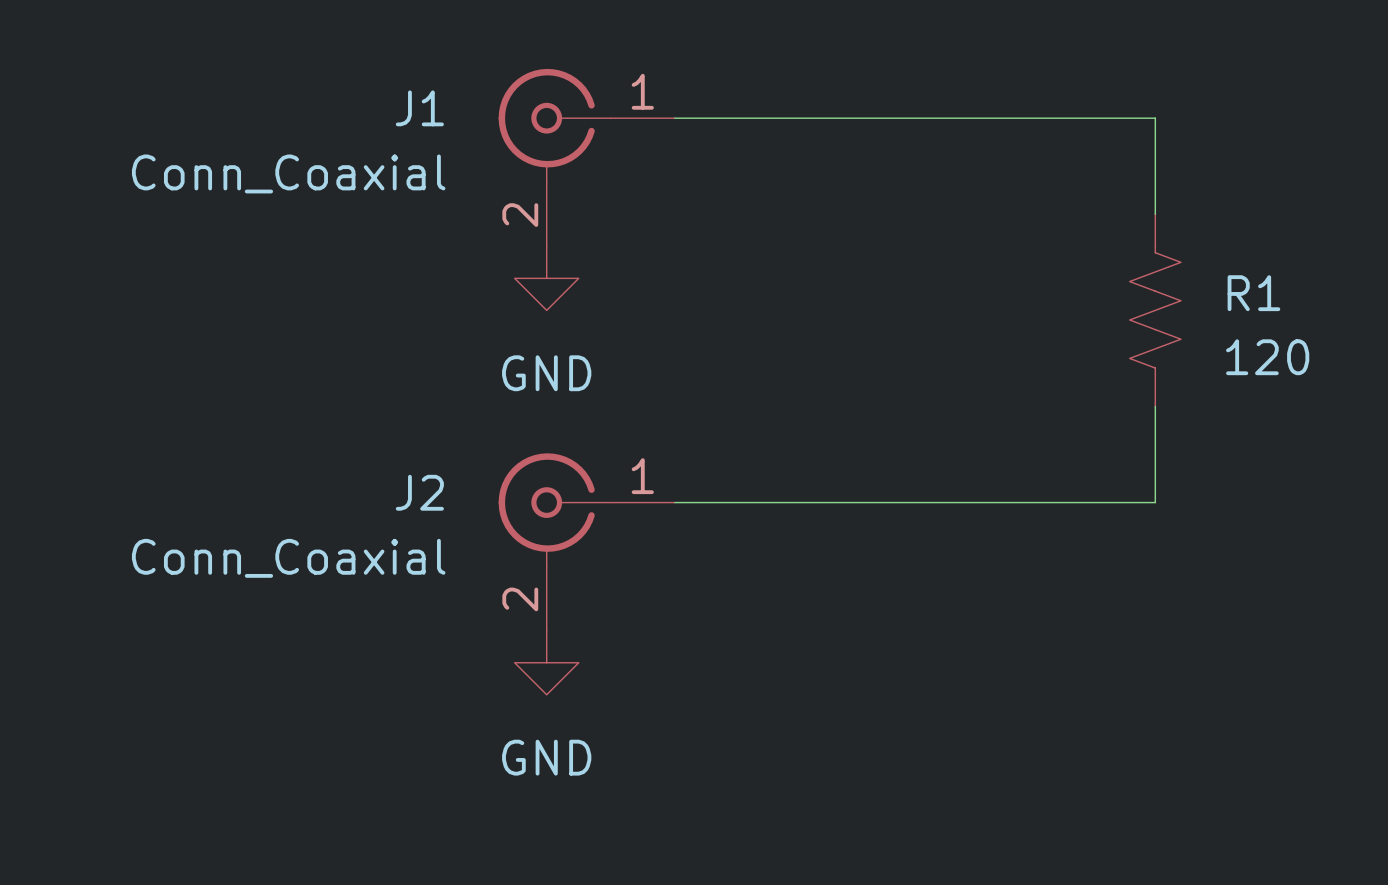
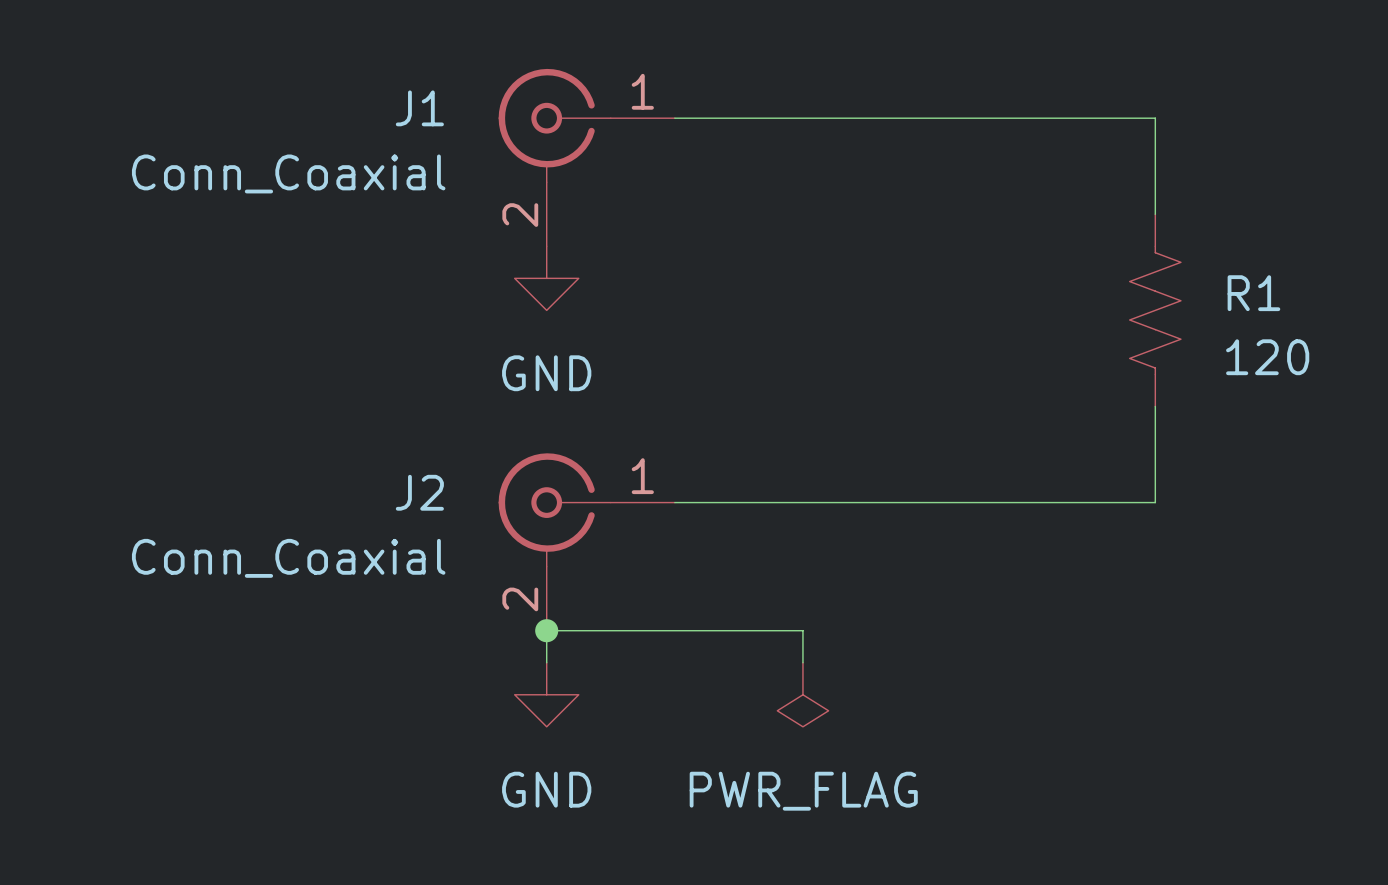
junction: none -> (546, 630)
wire: none -> (546, 662) (546, 630) (802, 630) (802, 662)
power symbol position: GND (546, 662) -> GND (546, 694)
power symbol: none -> PWR_FLAG (802, 694)

